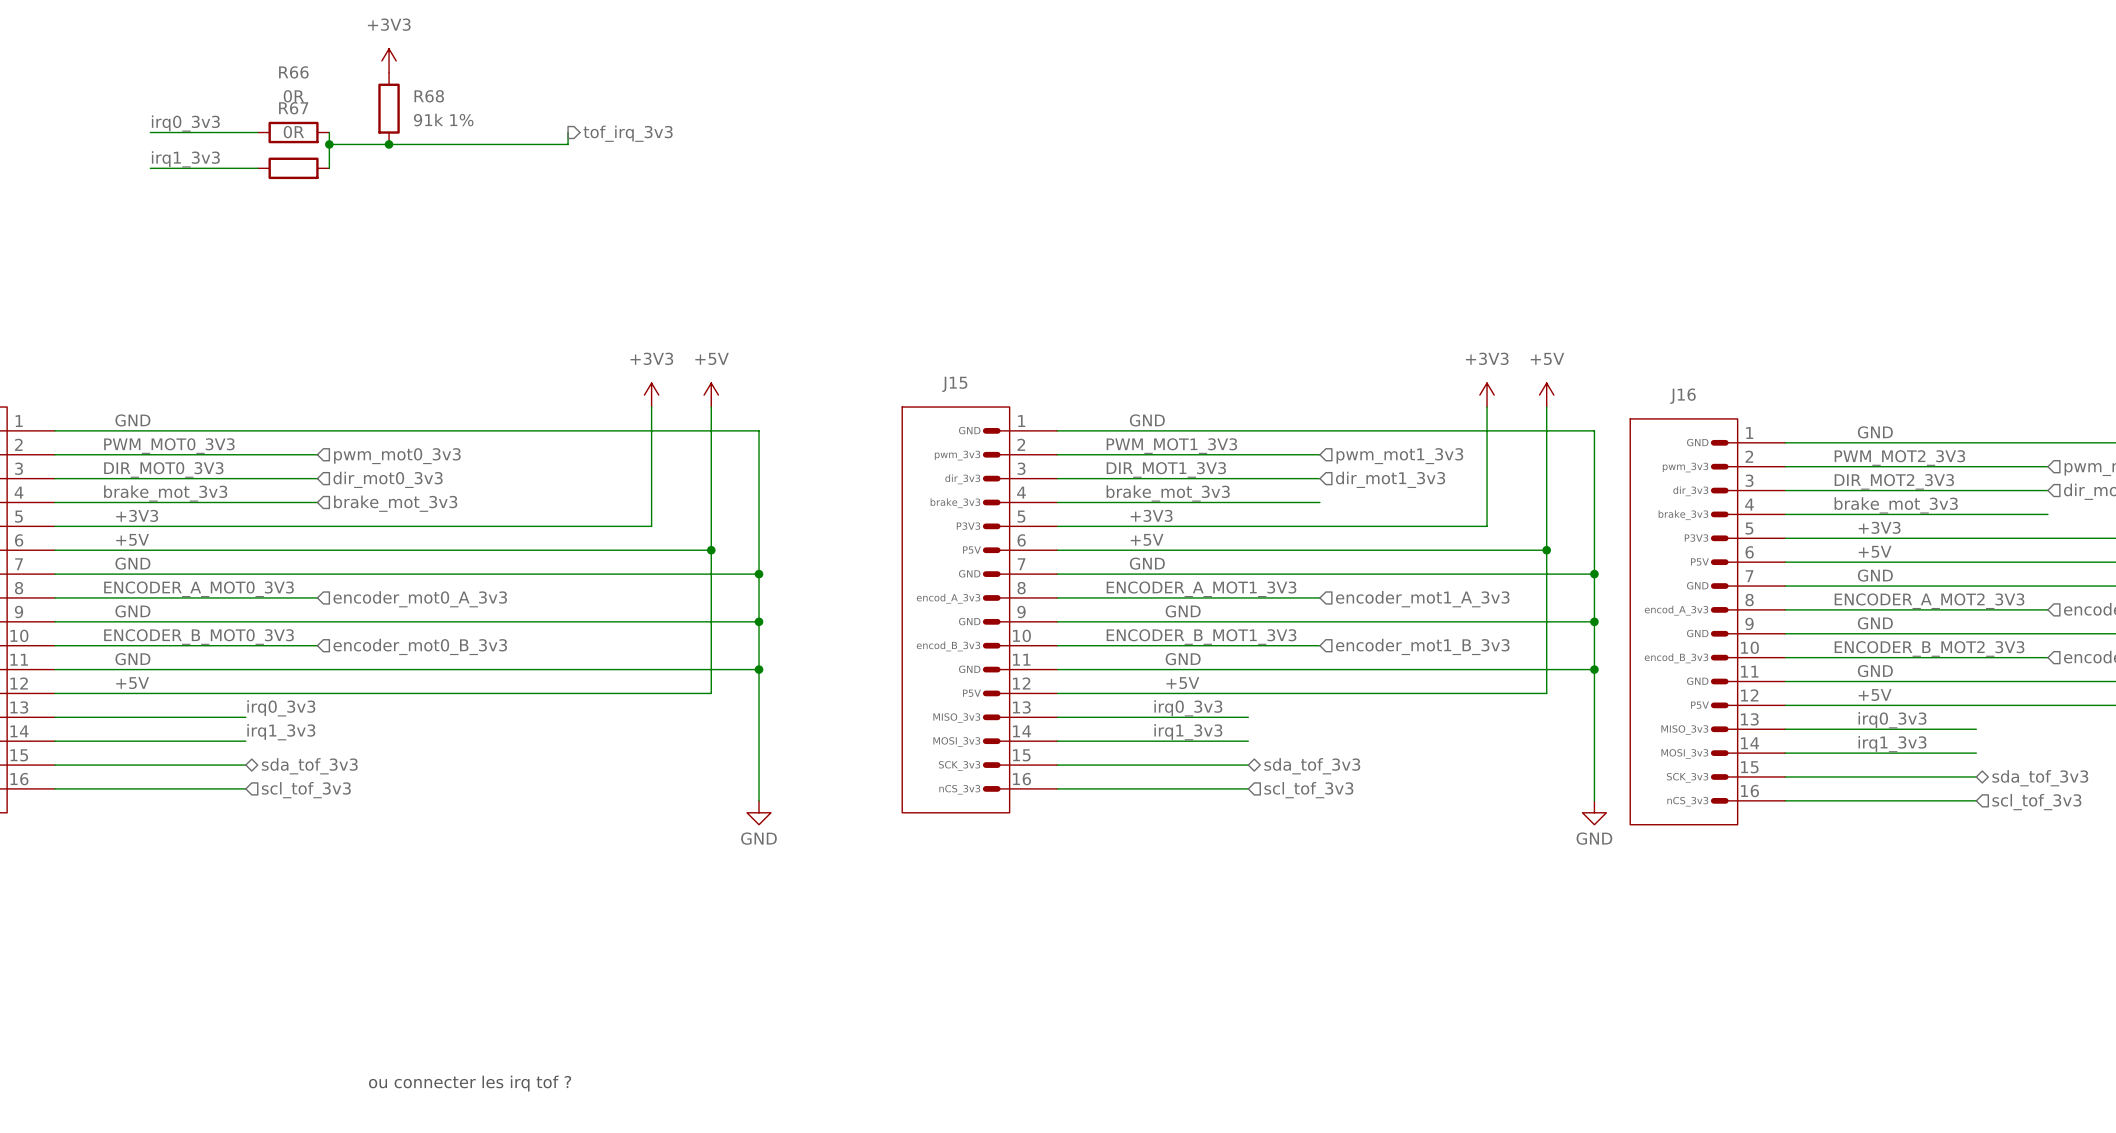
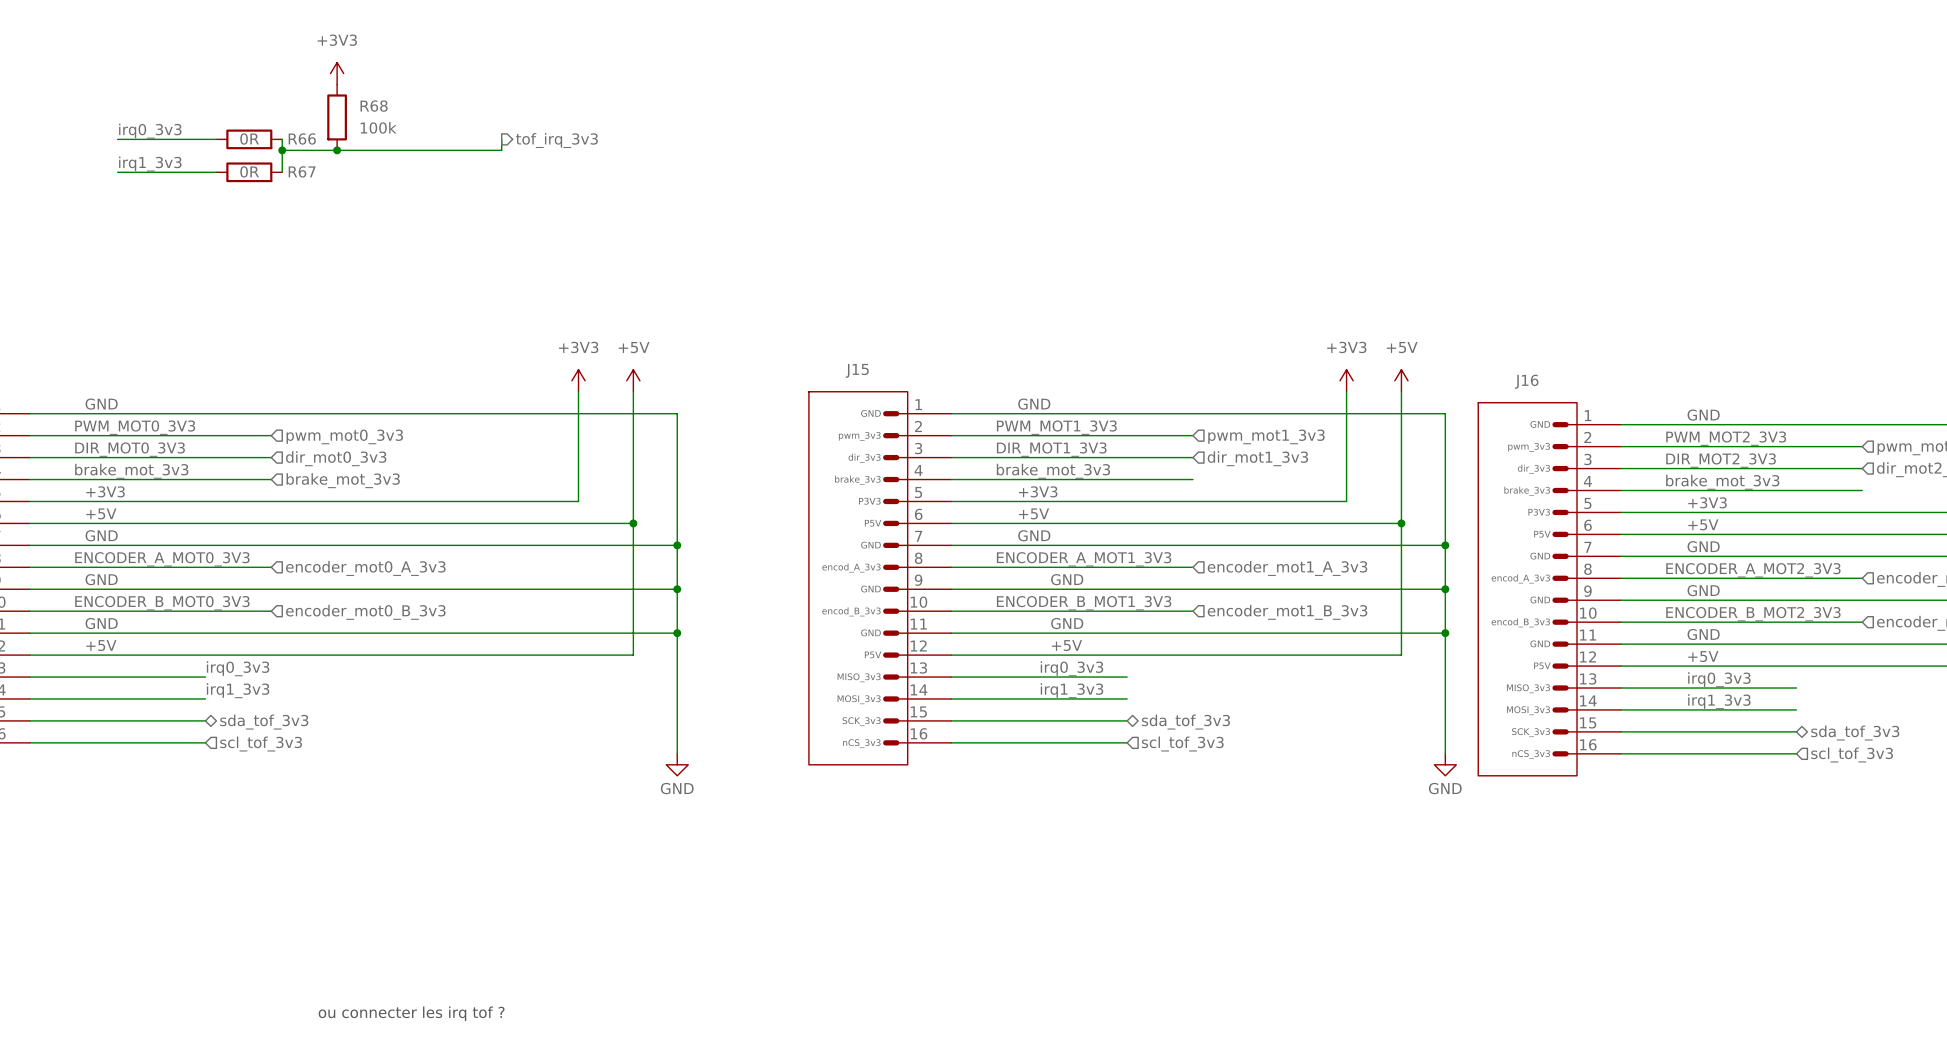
R66 name position: R66 (293, 72) -> R66 (302, 138)
R66 value position: 0R (293, 96) -> 0R (249, 138)
R67 name position: R67 (293, 108) -> R67 (302, 171)
R68 value: 91k 1% (443, 120) -> 100k (378, 127)
R67 value position: 0R (293, 132) -> 0R (249, 171)

